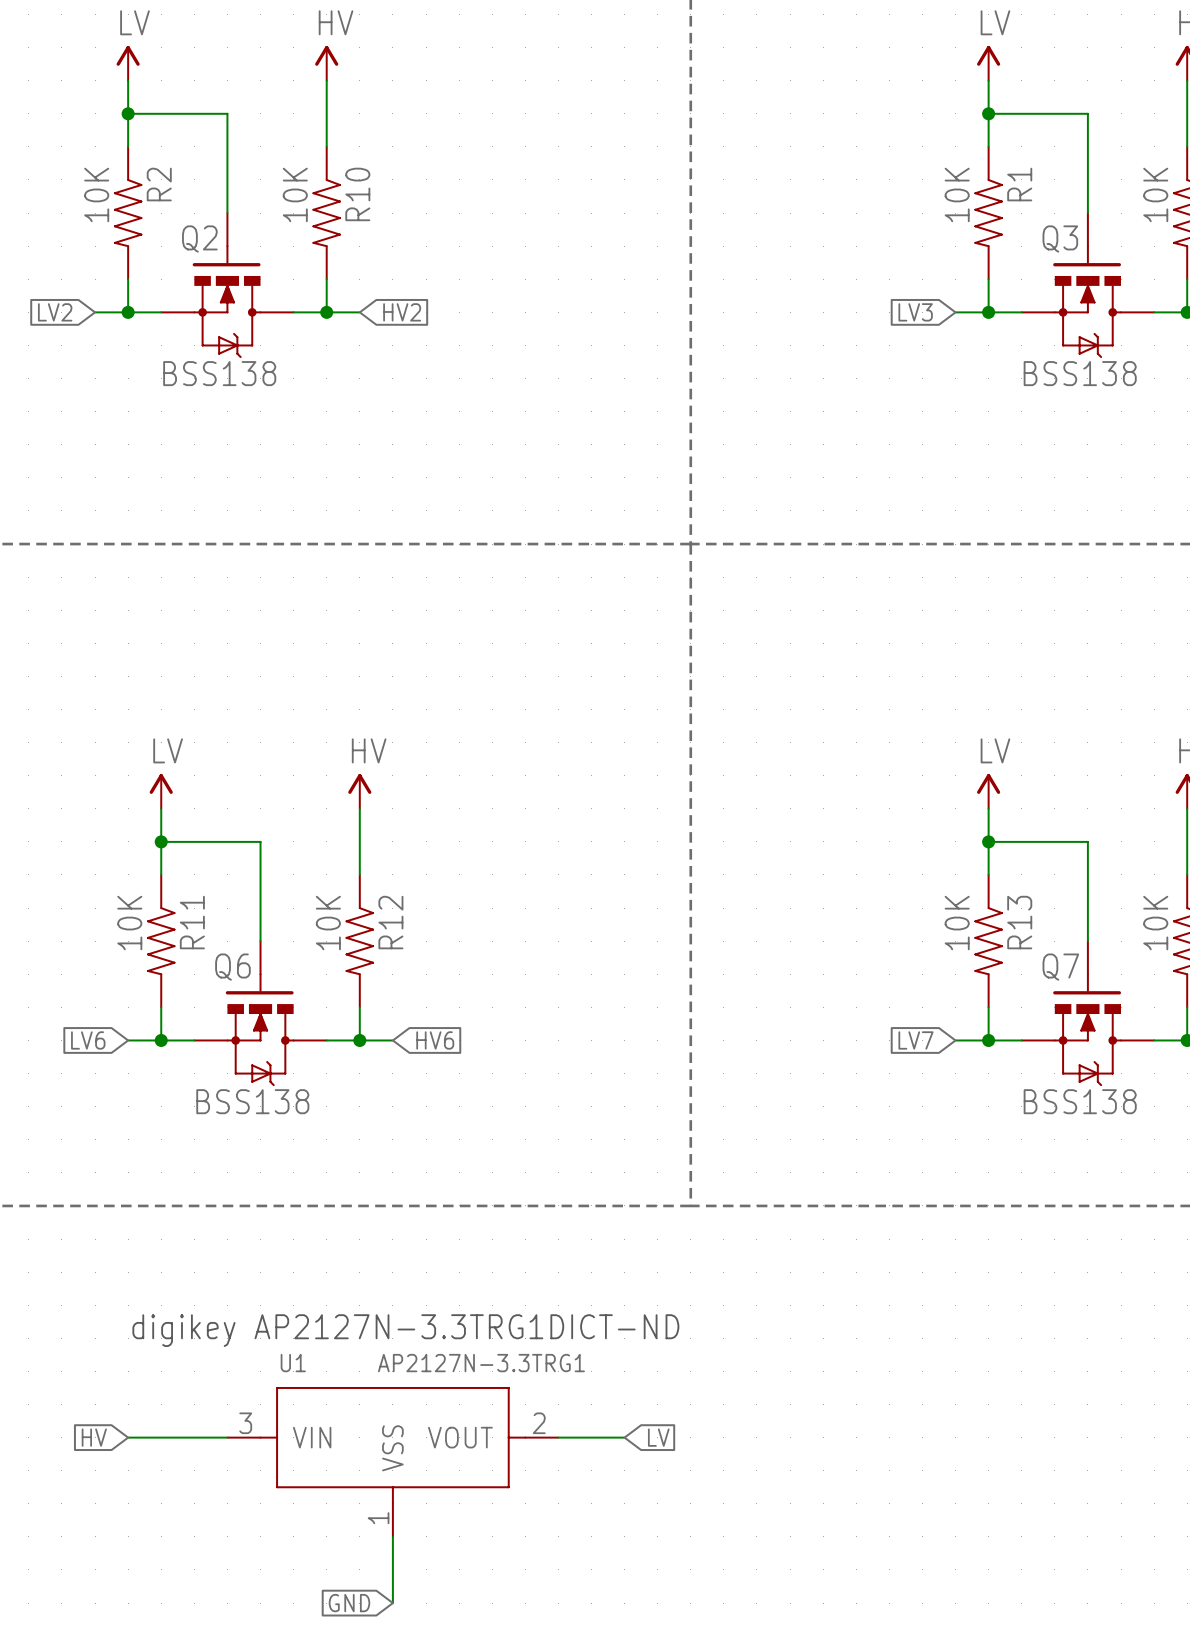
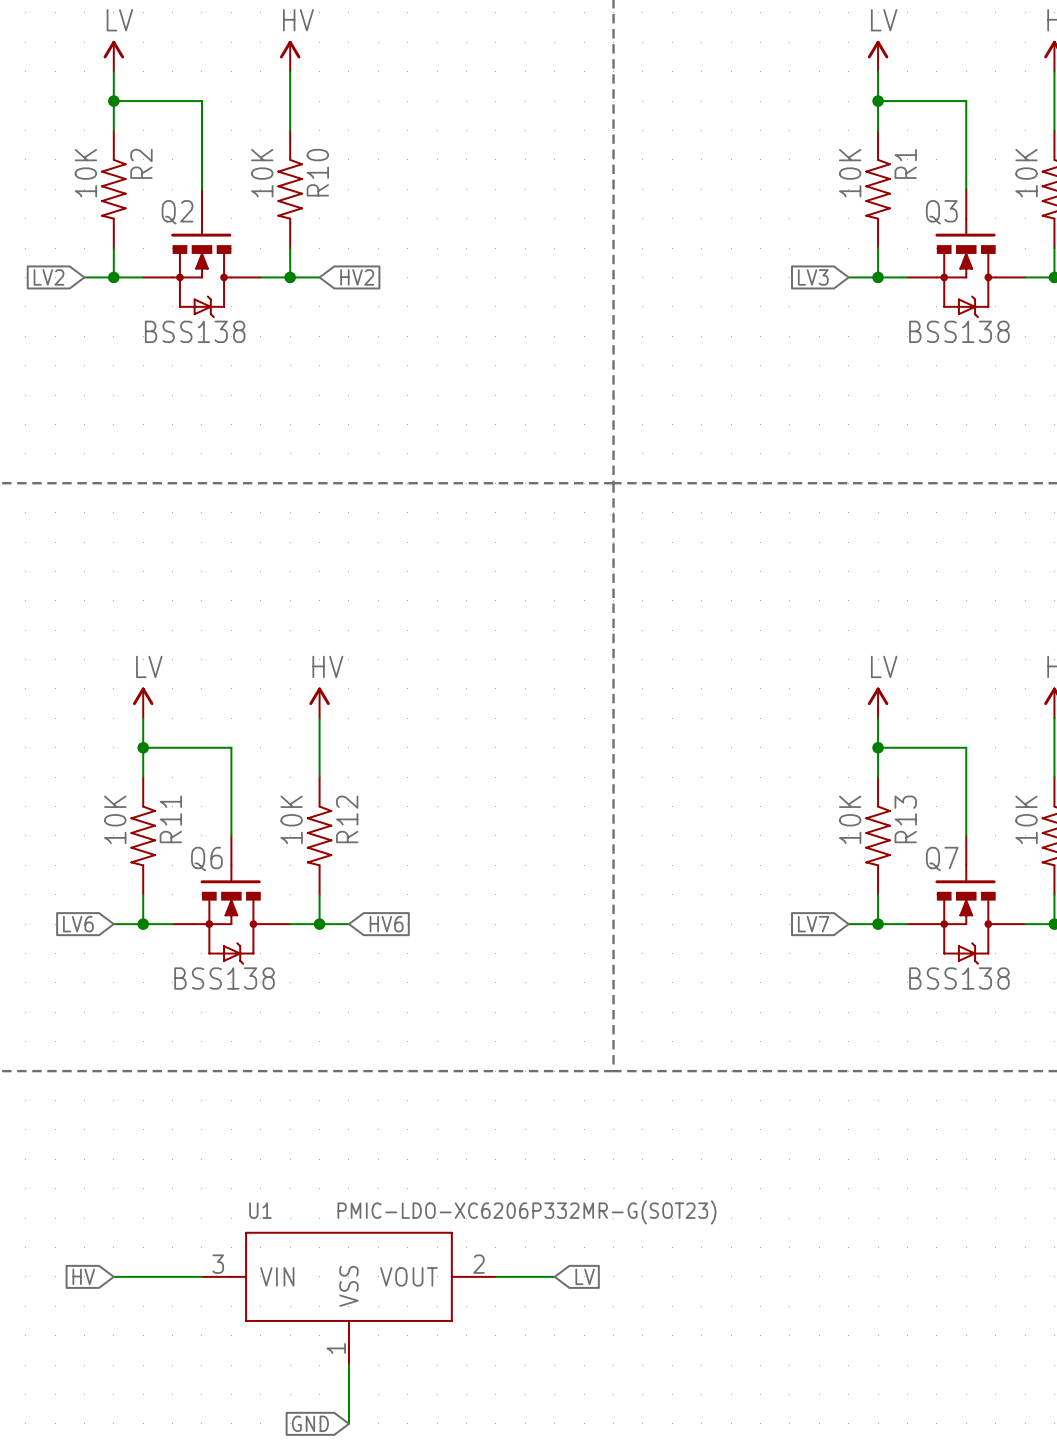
text: digikey AP2127N-3.3TRG1DICT-ND (405, 1330) -> none
U1 value: AP2127N-3.3TRG1 (481, 1363) -> PMIC-LDO-XC6206P332MR-G(SOT23) (526, 1212)

